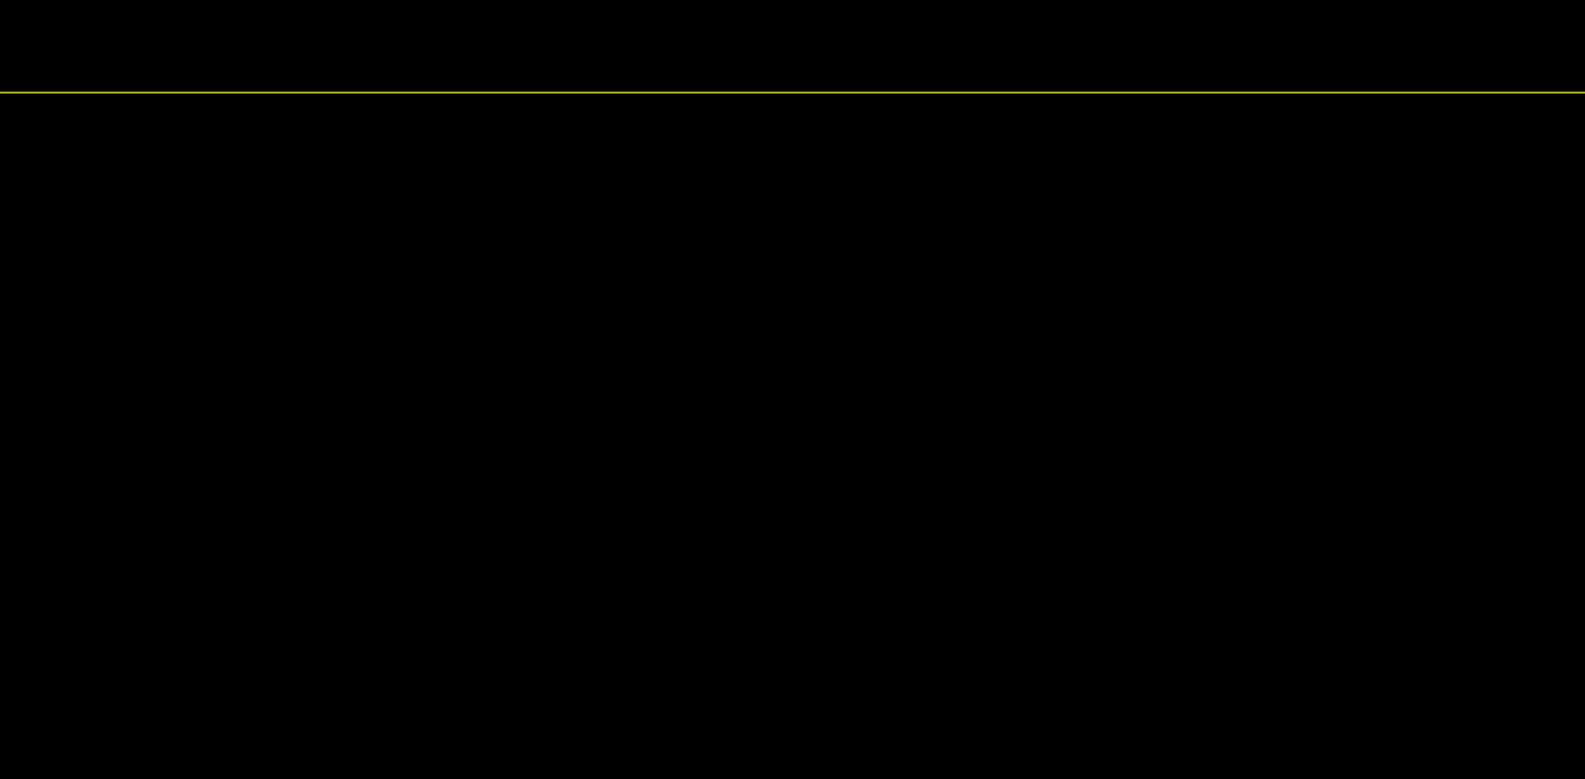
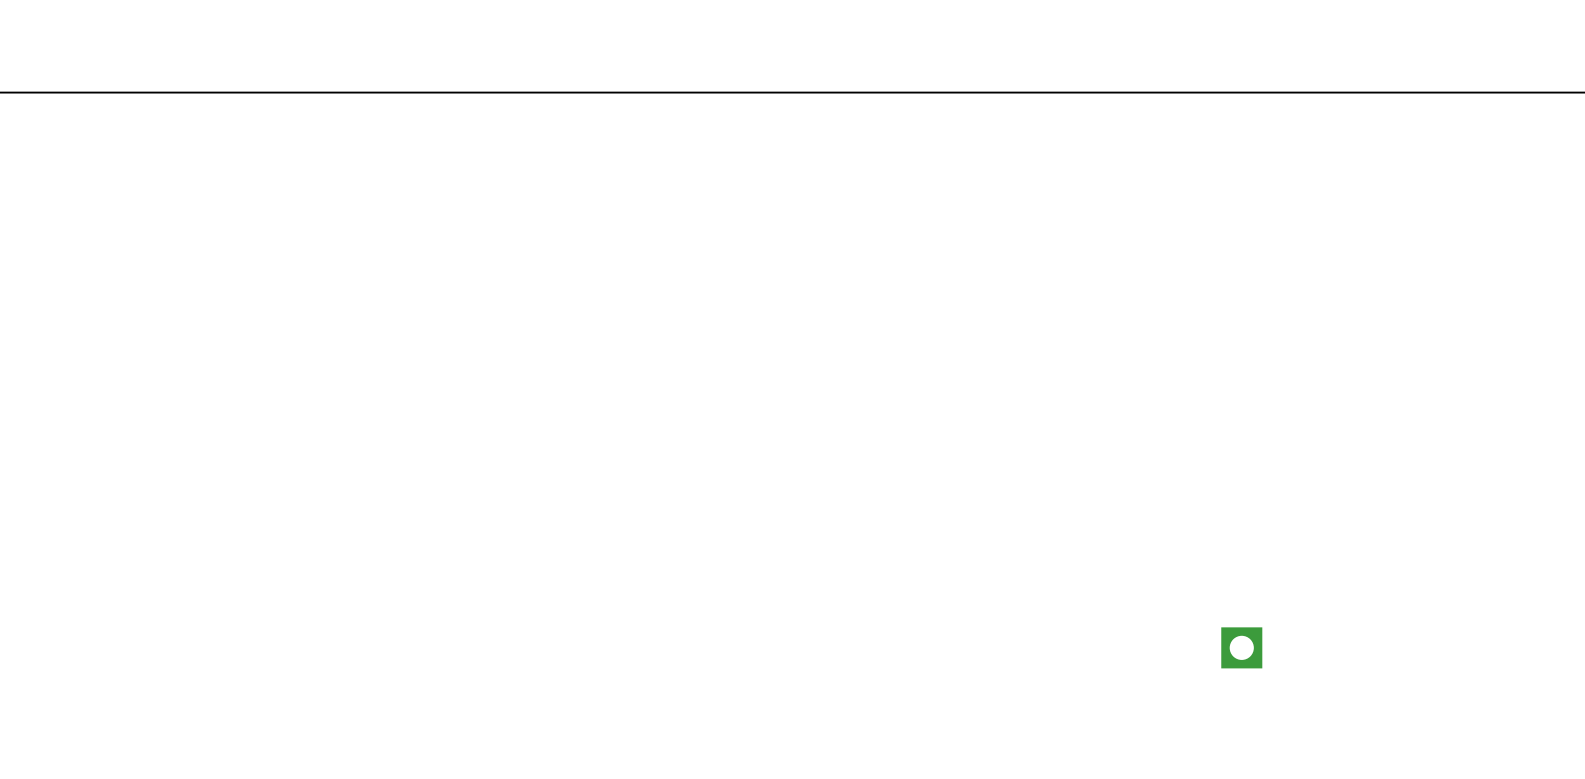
part: none -> (1241, 647)

